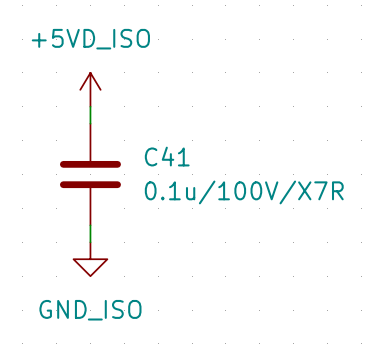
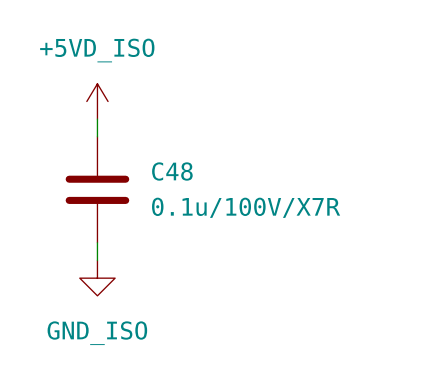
C41 name: C41 (167, 156) -> C48 (172, 171)

